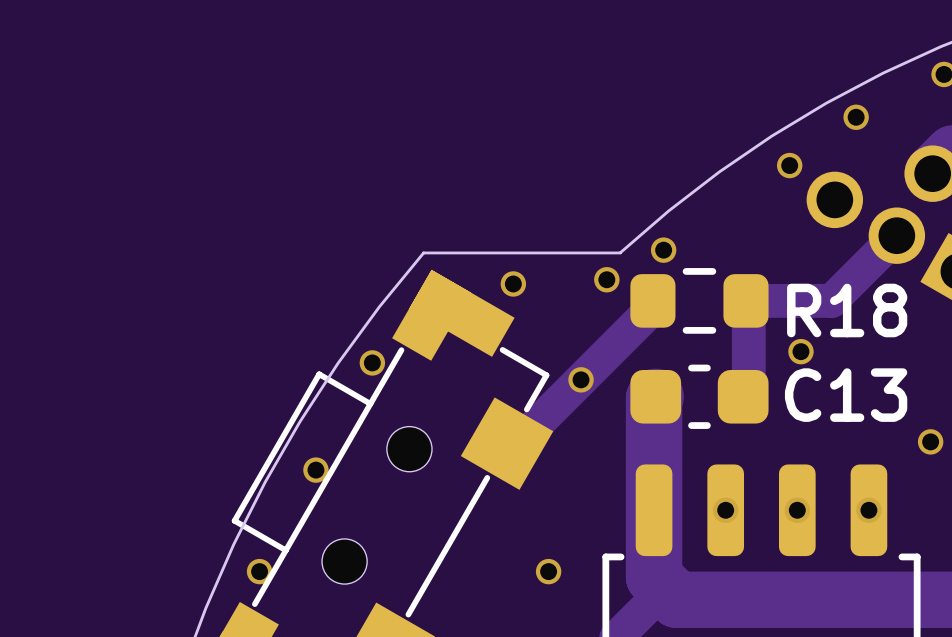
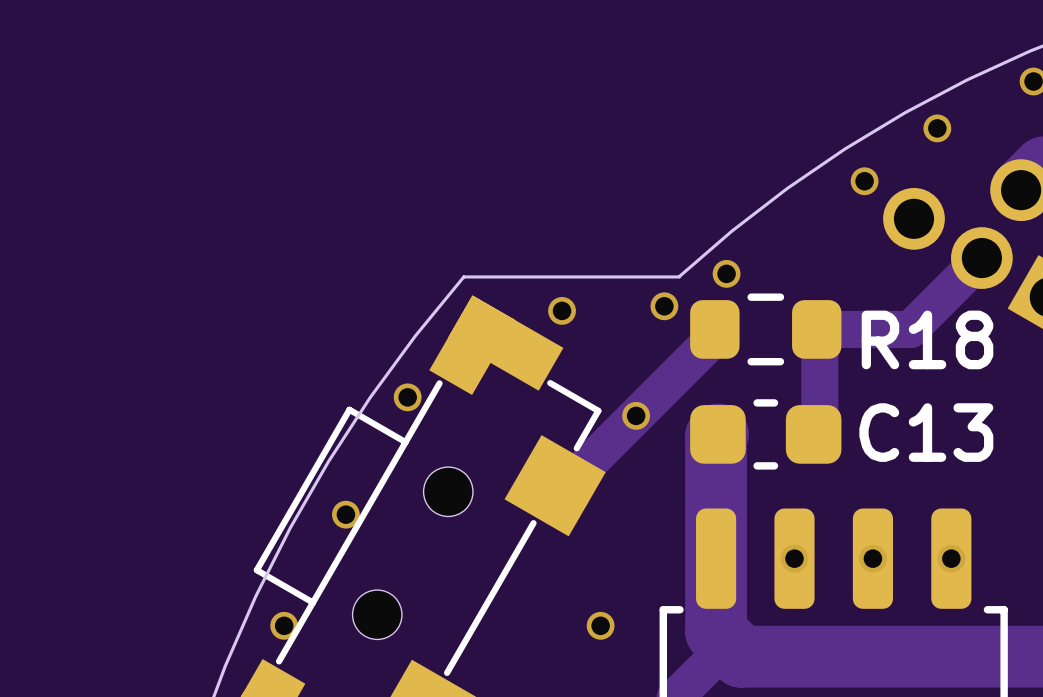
via: (800, 351) -> none
via: (930, 441) -> none

